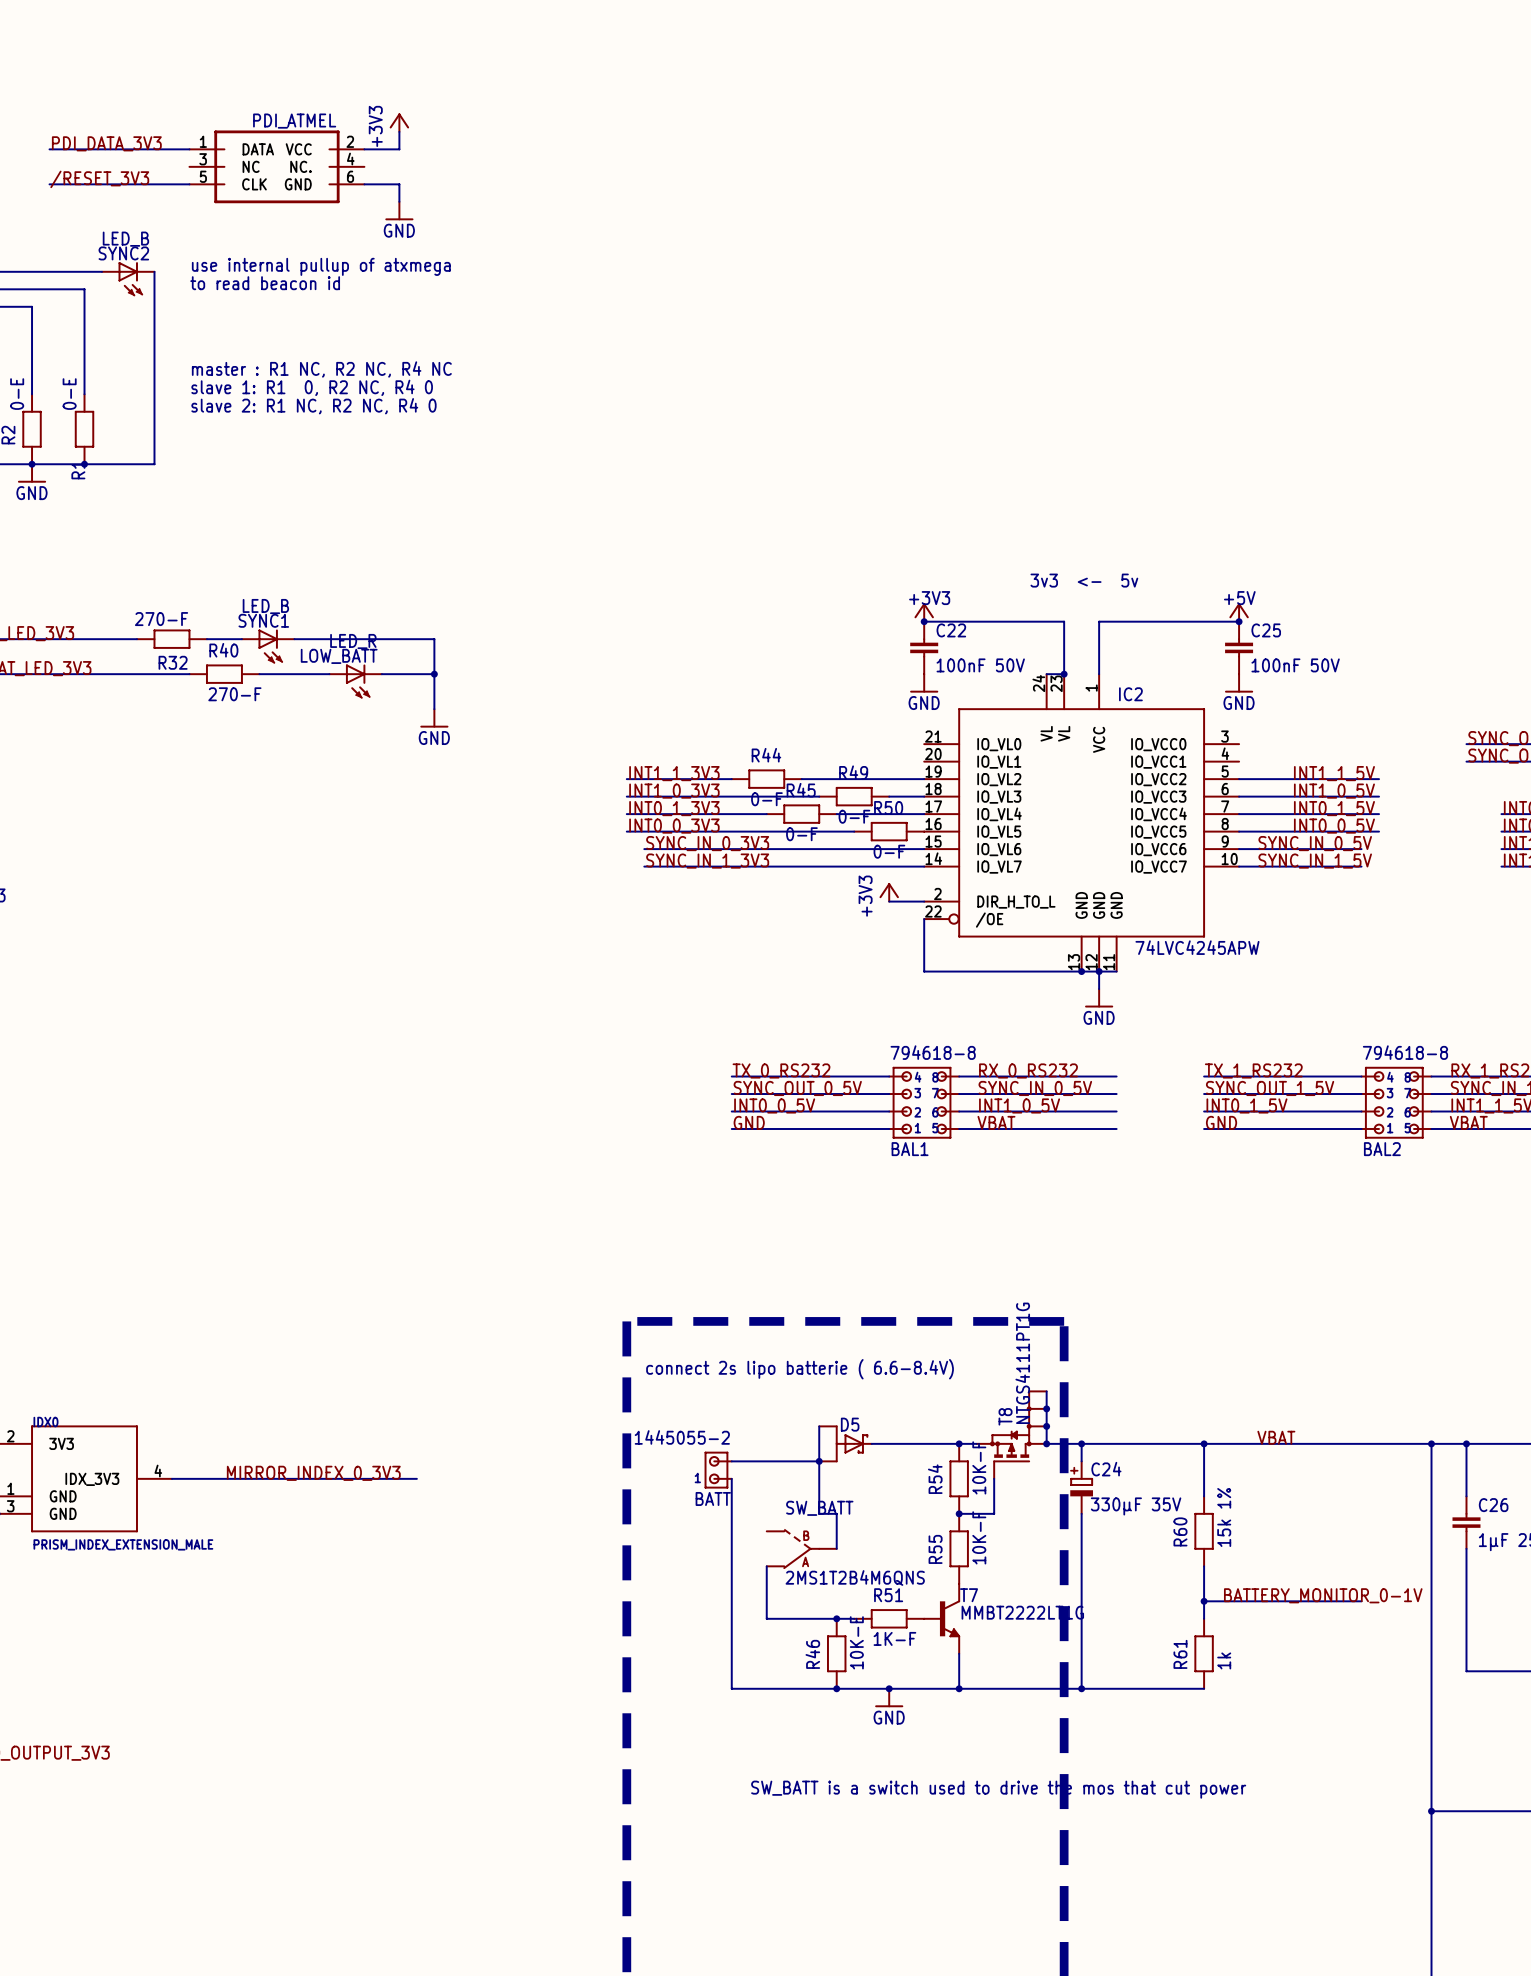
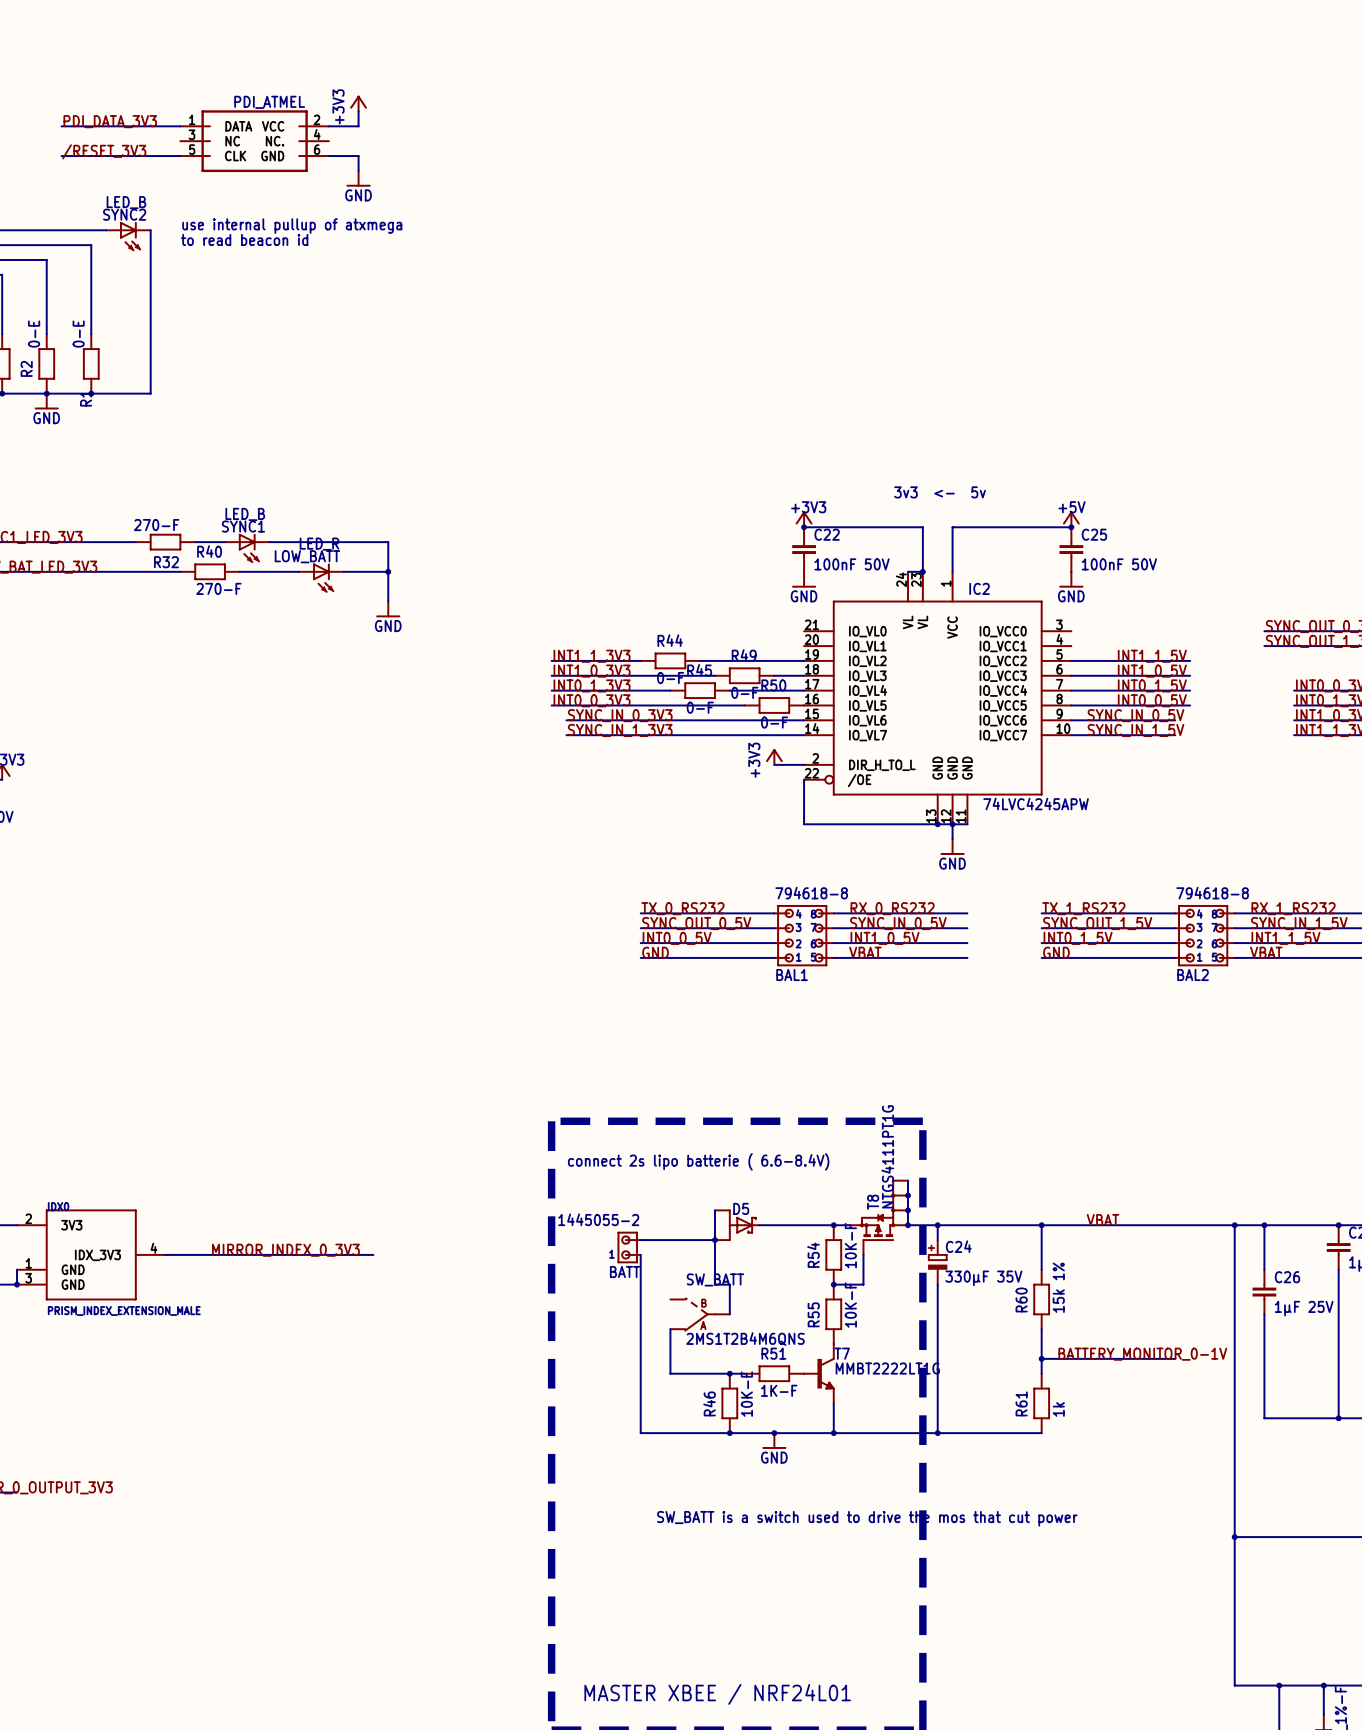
text: master : R1 NC, R2 NC, R4 NC (321, 369) -> none
text: slave 1: R1 0, R2 NC, R4 0 (312, 387) -> none
text: slave 2: R1 NC, R2 NC, R4 0 (313, 406) -> none

